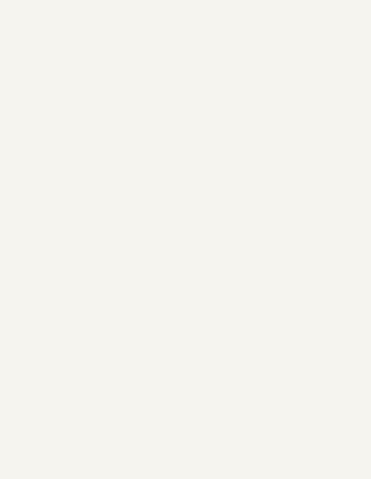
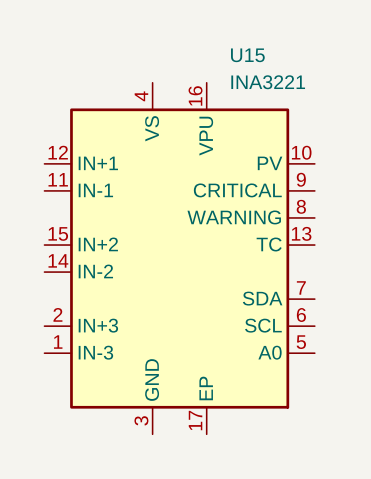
U15: none -> INA3221 (179, 258)

